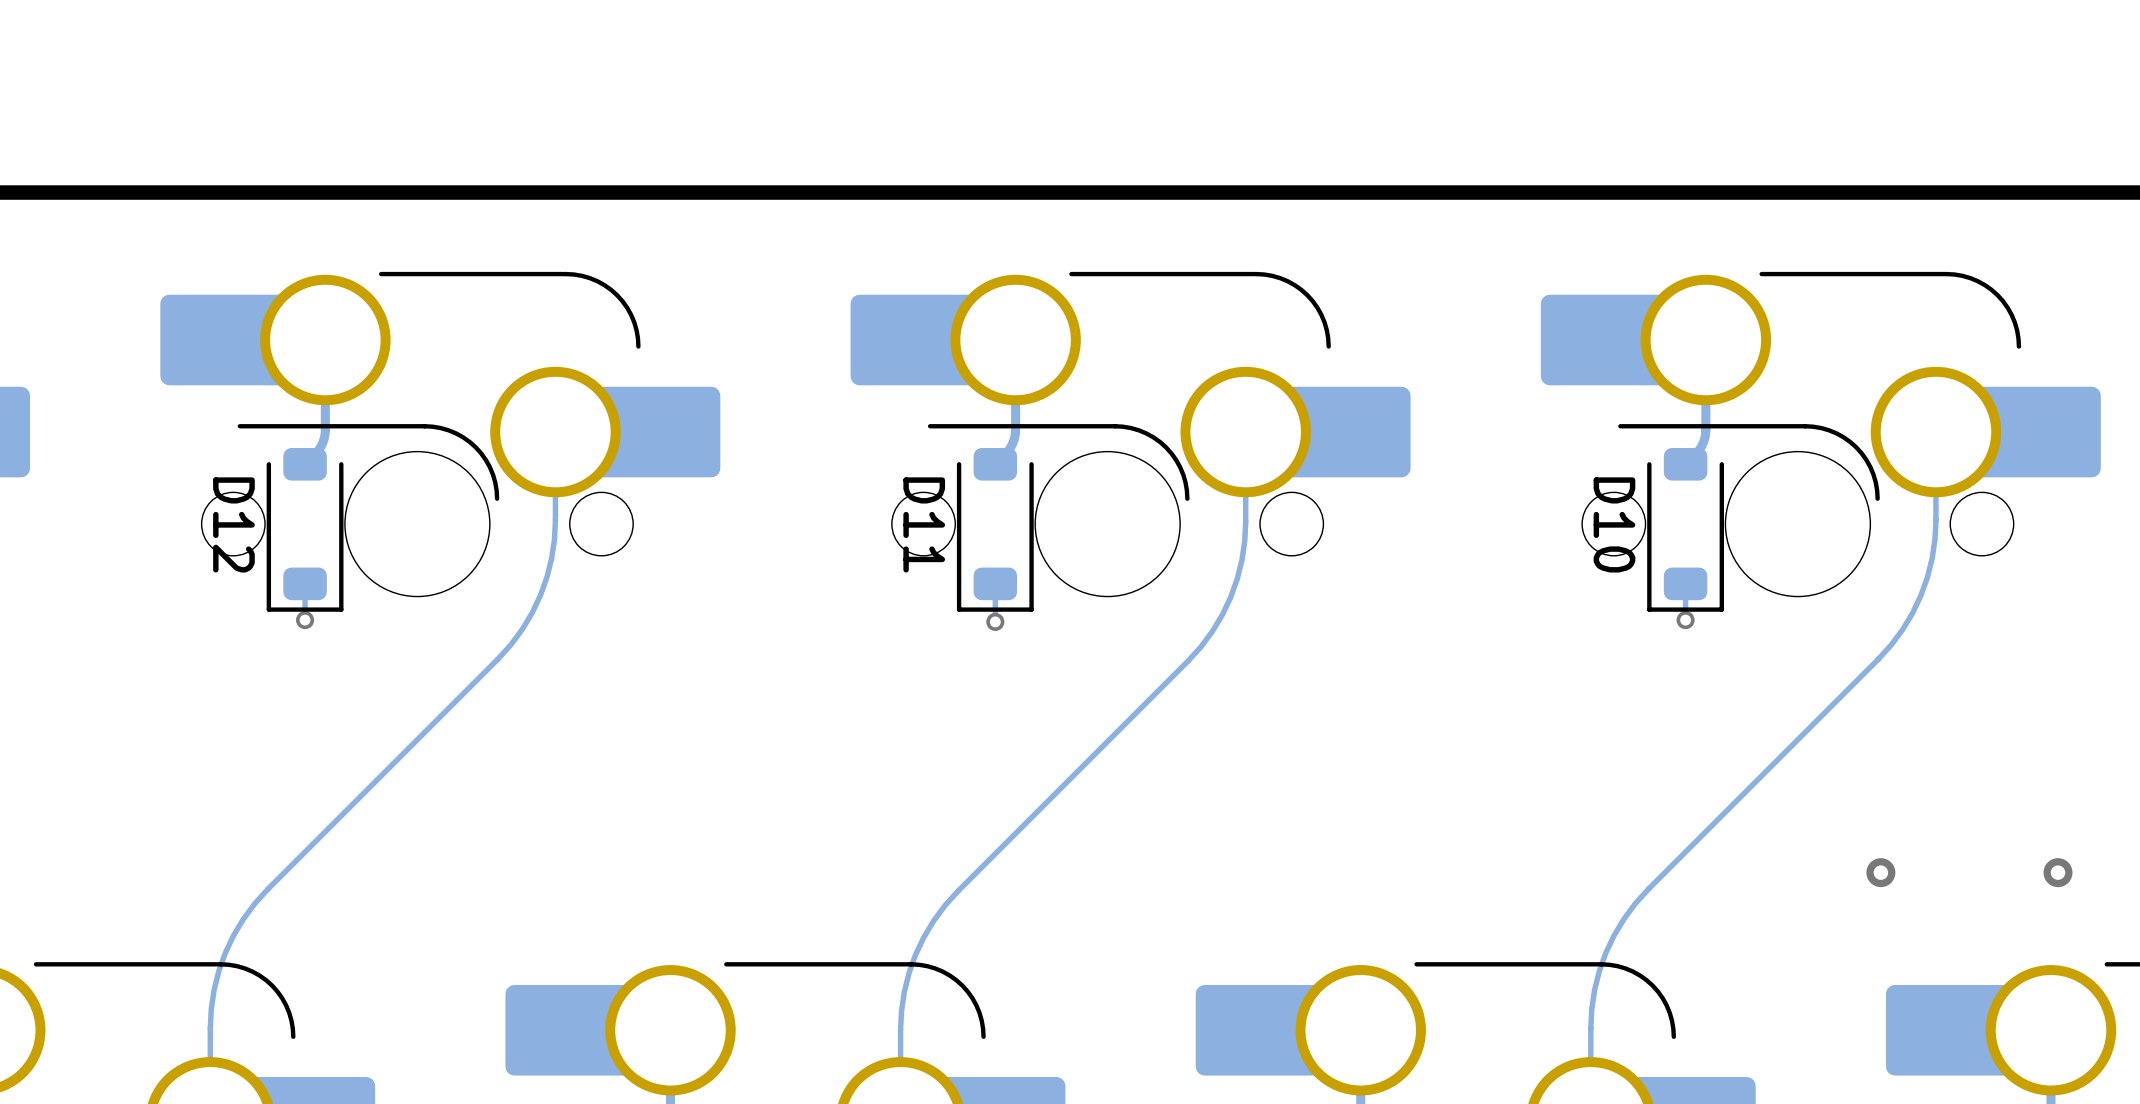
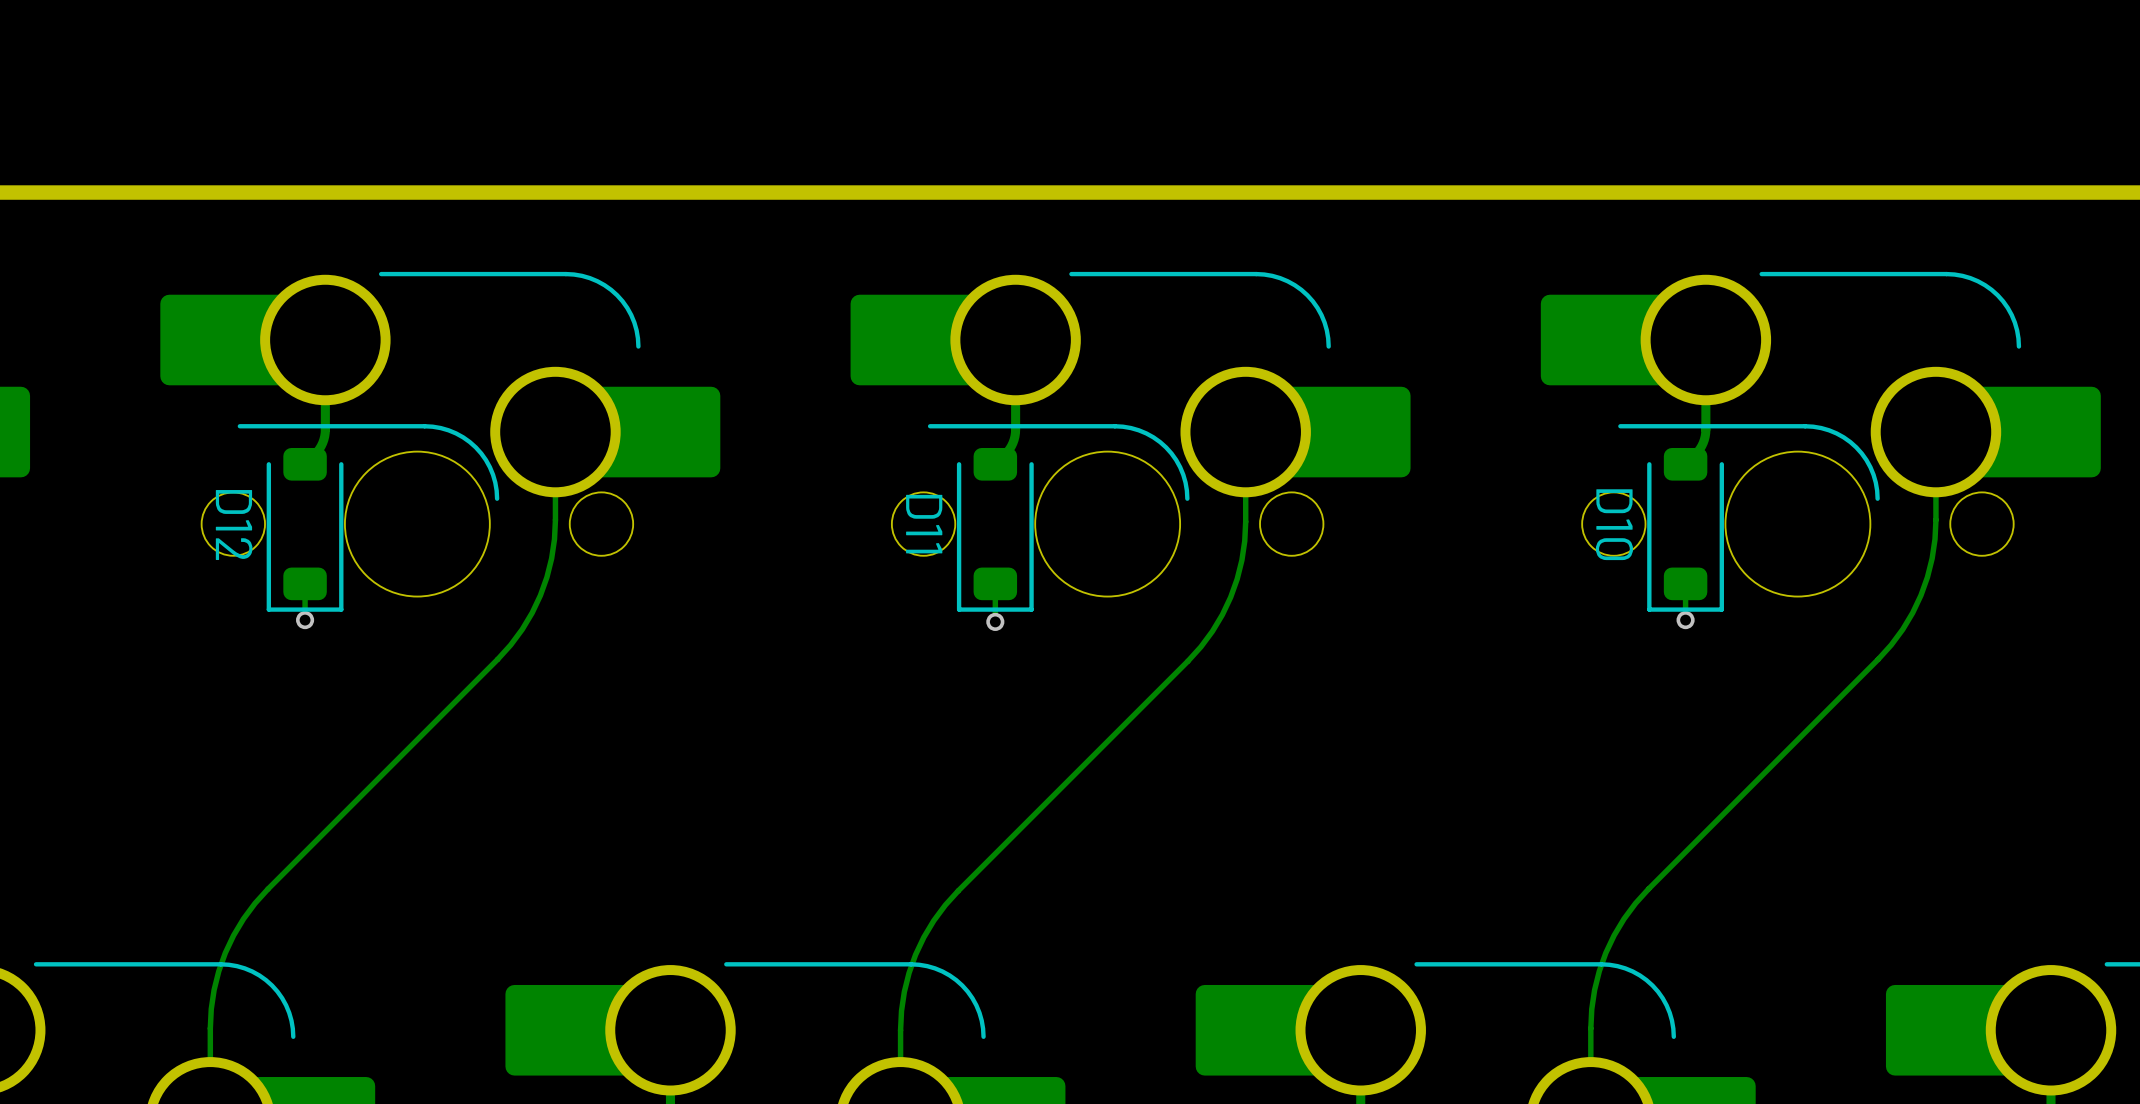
via: (1880, 872) -> none
via: (2058, 872) -> none

